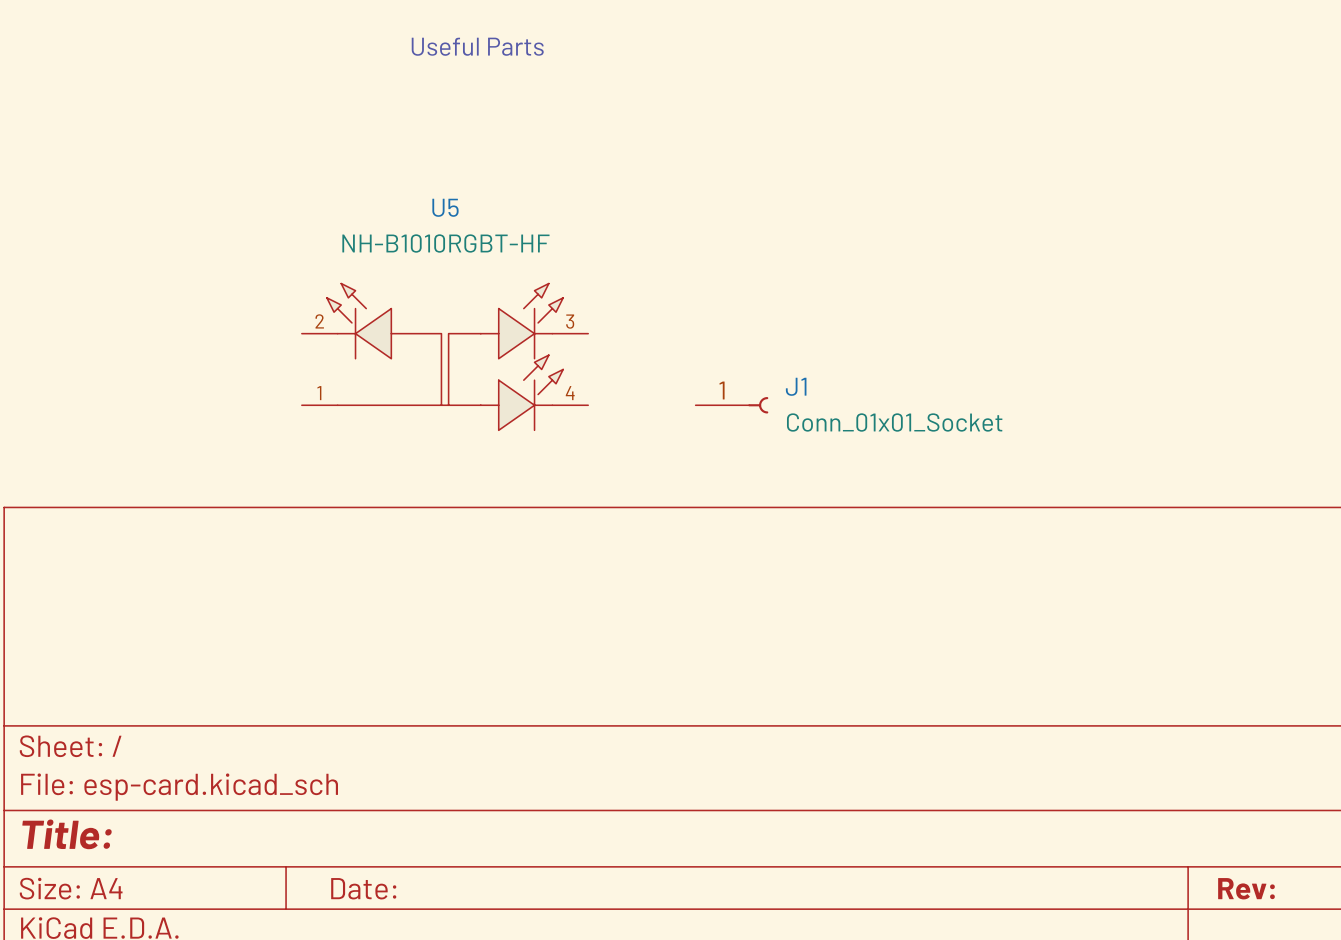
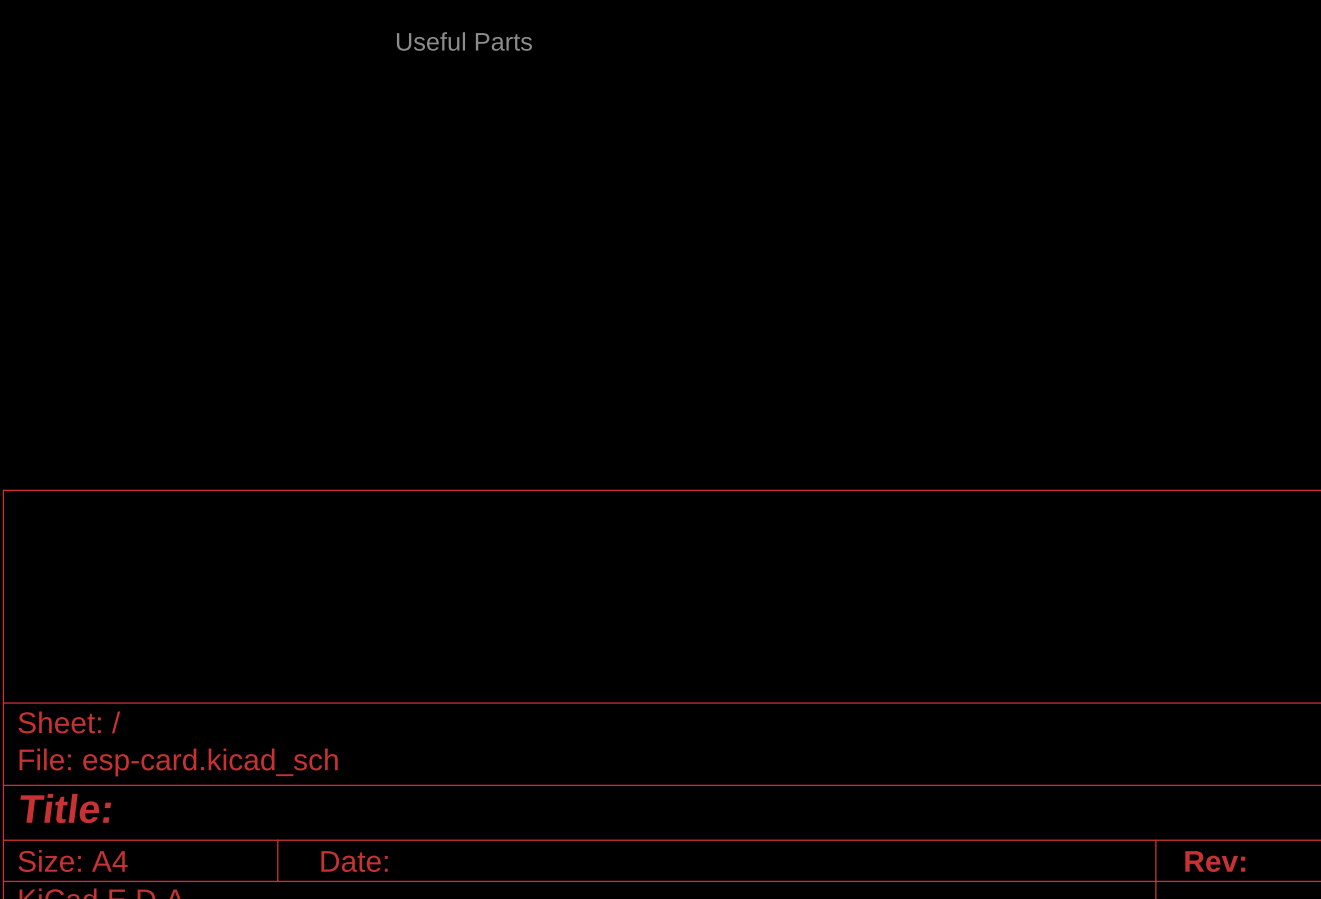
U5: NH-B1010RGBT-HF (445, 356) -> none
J1: Conn_01x01_Socket (731, 405) -> none

